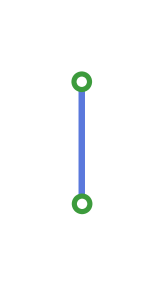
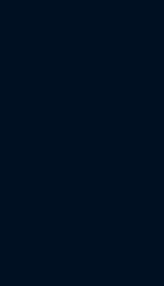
track: (81, 81) (81, 203) -> none
via: (81, 81) -> none
via: (82, 203) -> none

